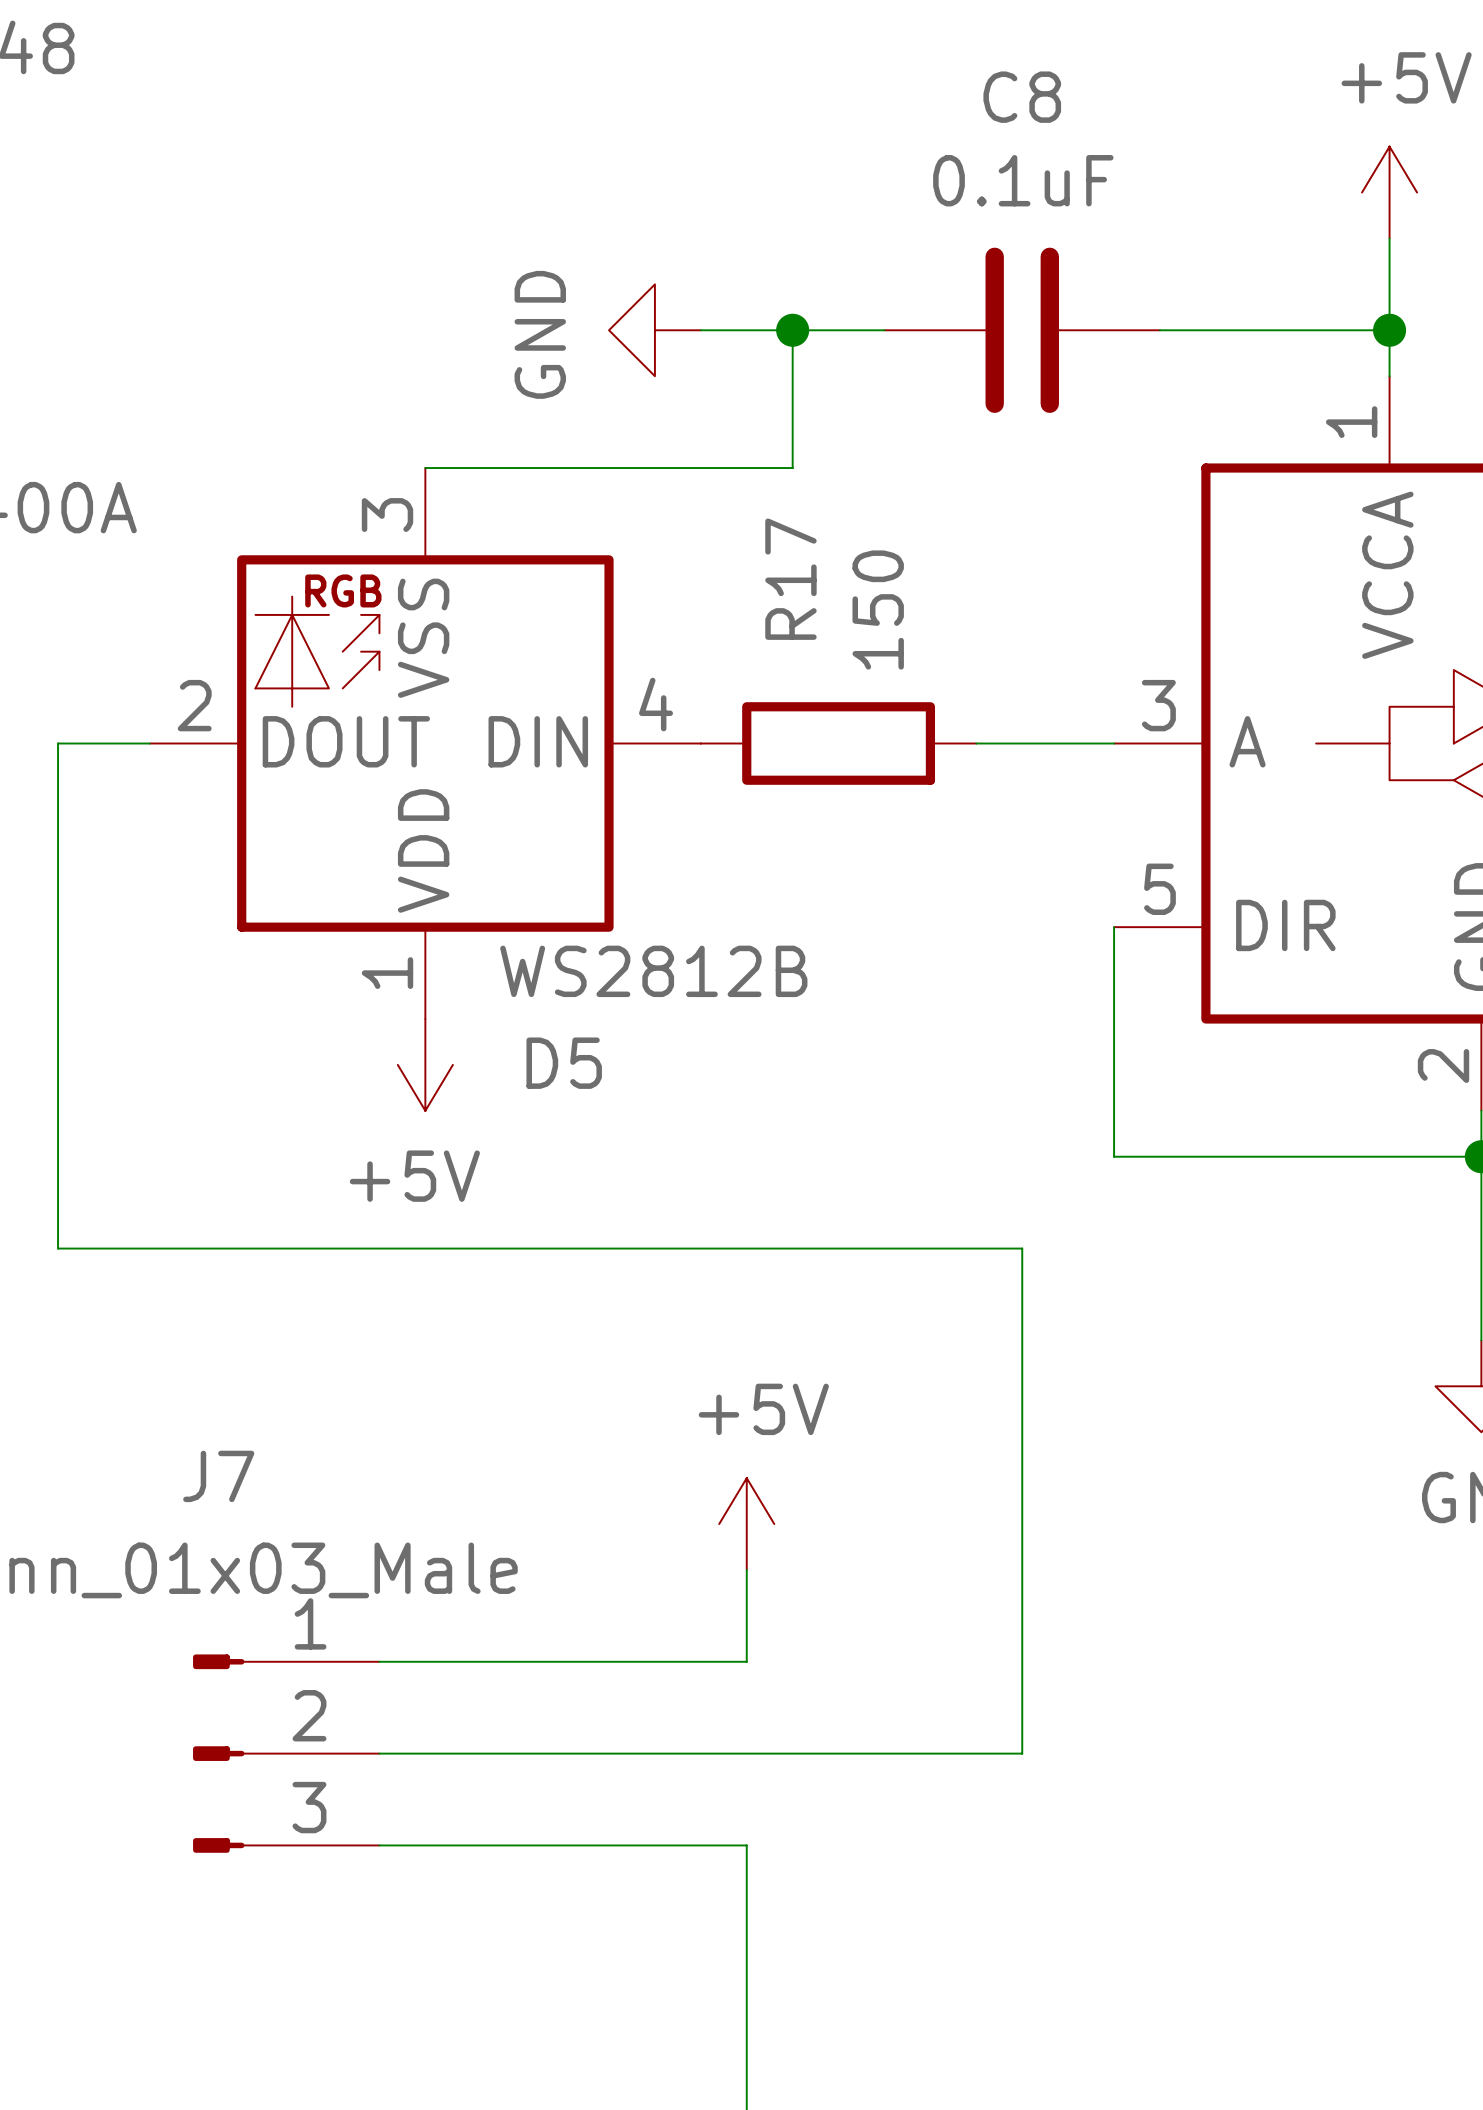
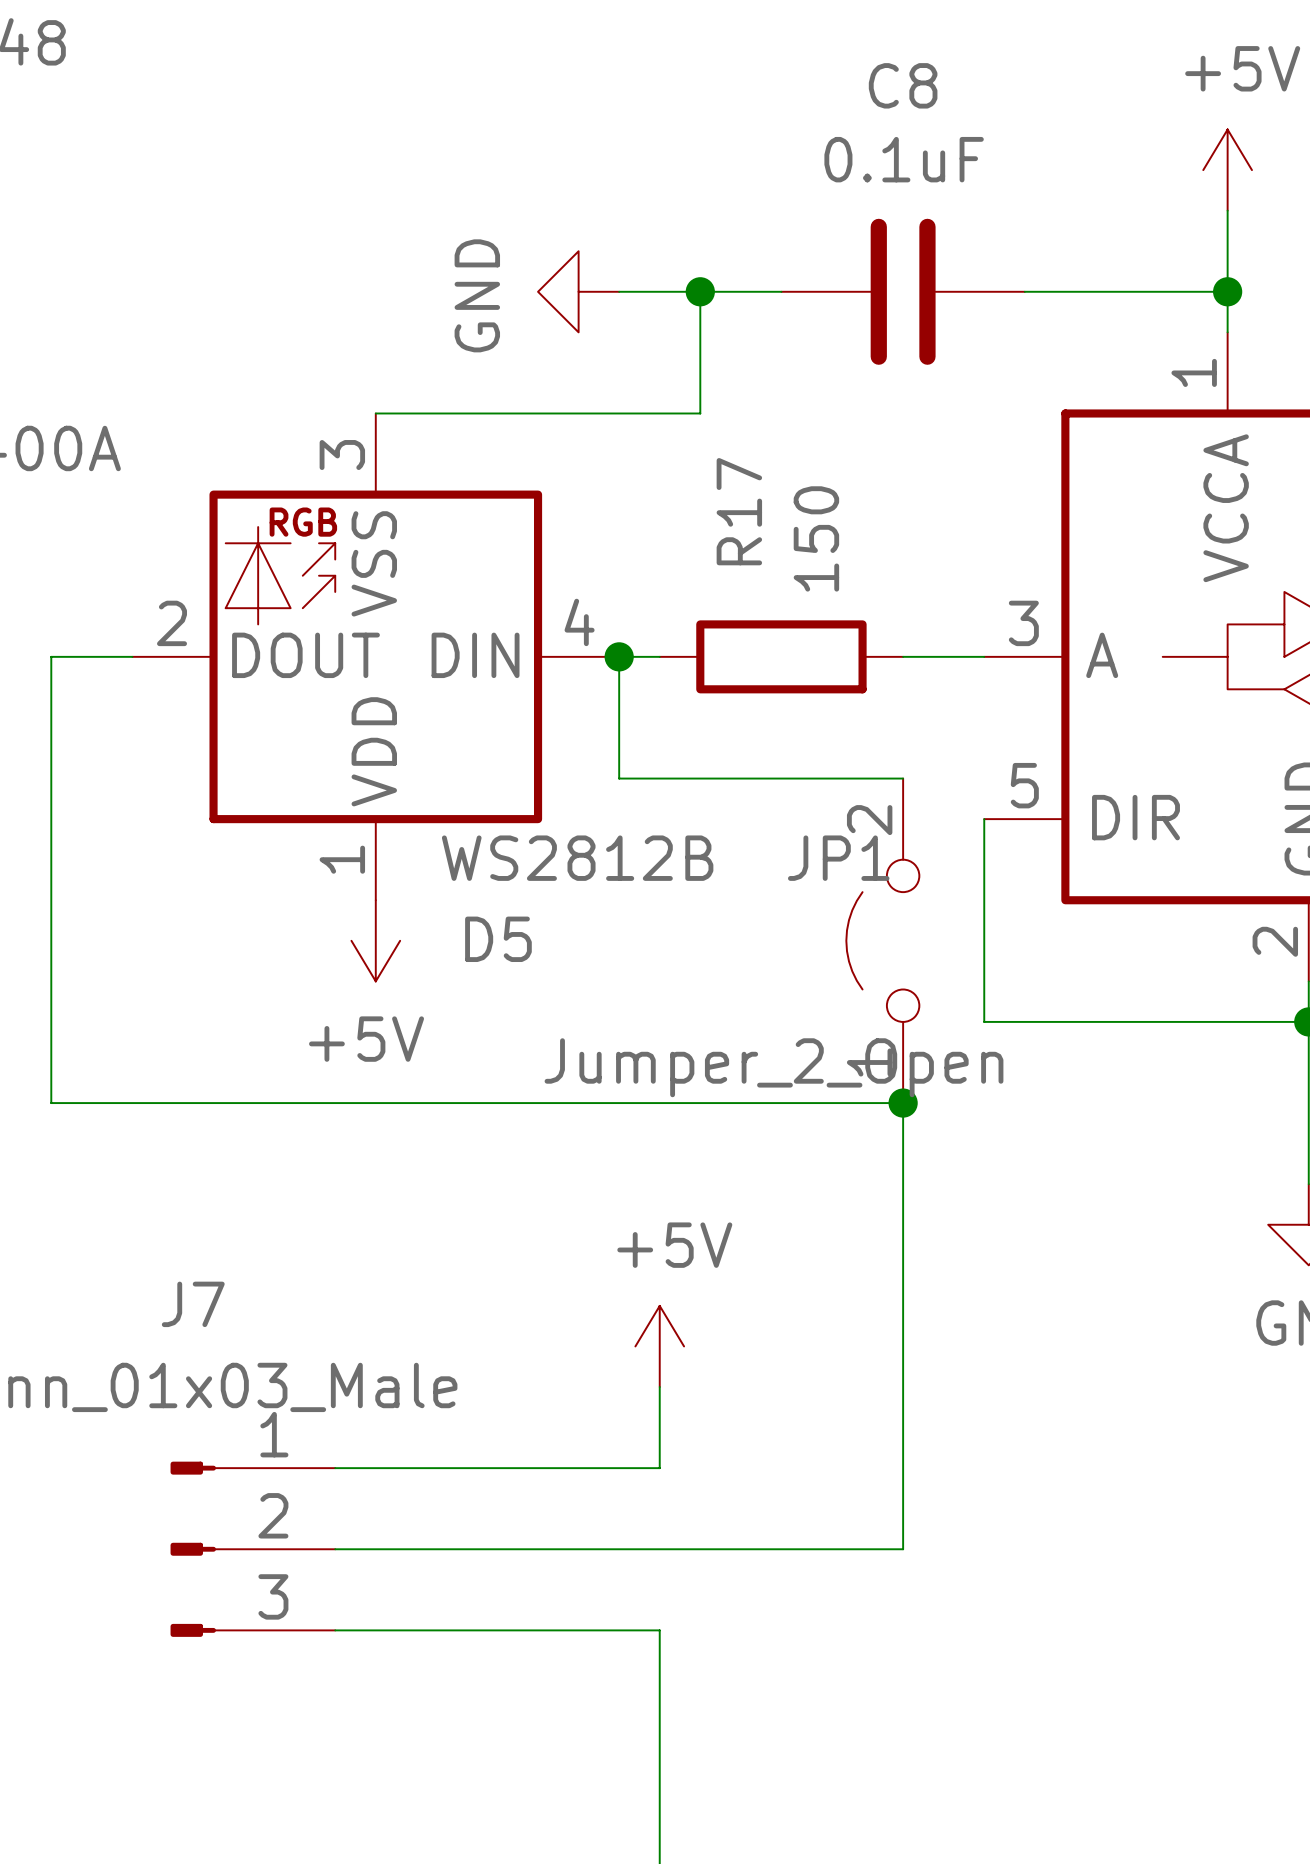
junction: none -> (619, 656)
wire: none -> (659, 656) (619, 656) (619, 778) (903, 778)
R17 position: (838, 743) -> (781, 656)
JP1: none -> Jumper_2_Open (882, 940)
junction: none -> (903, 1103)

